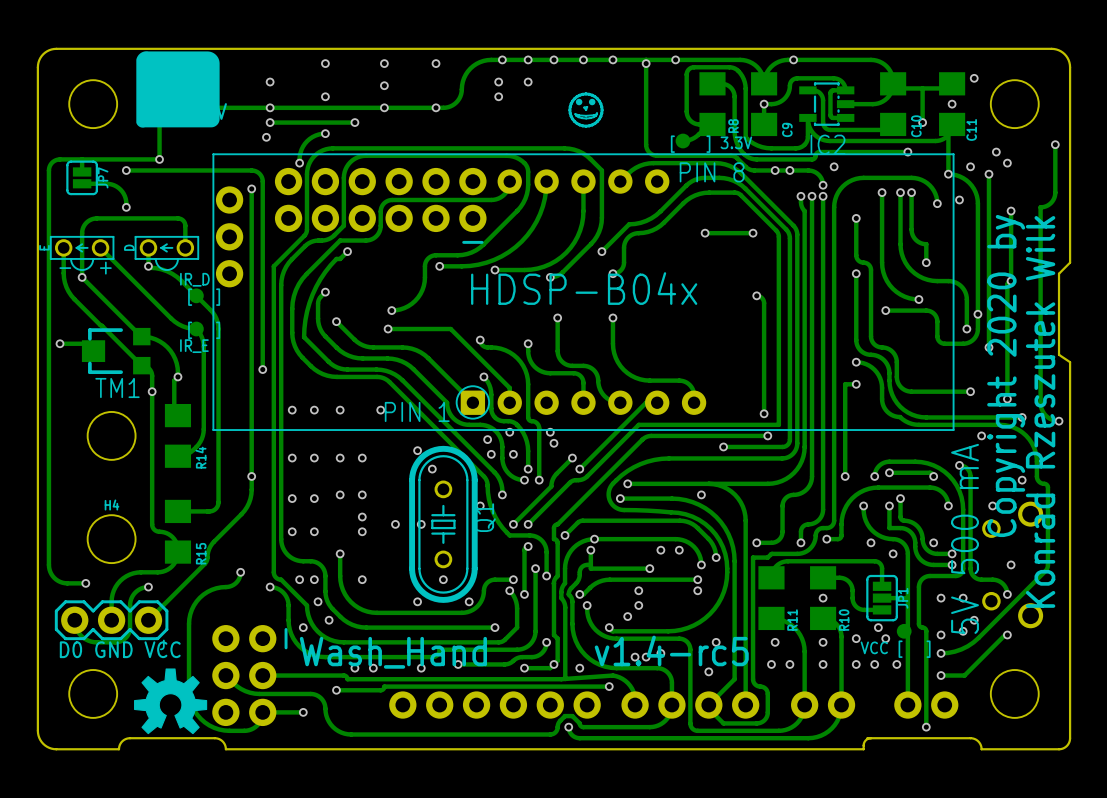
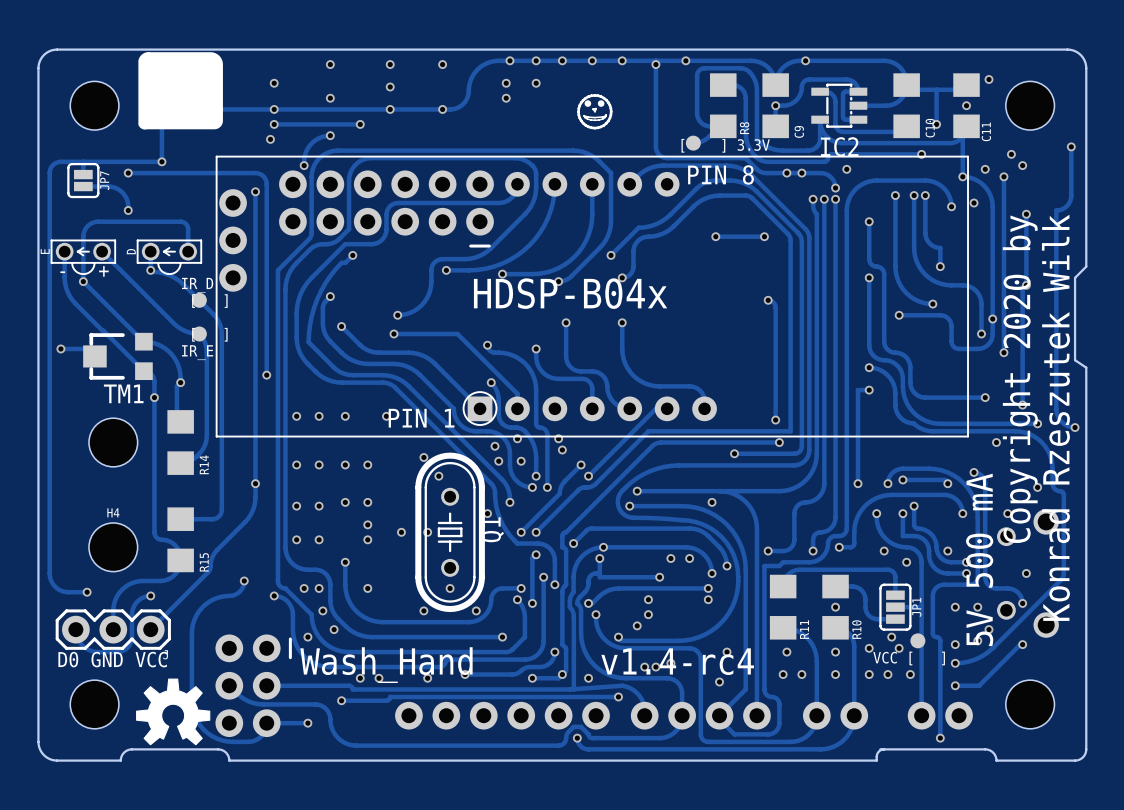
text: v1.4-rc5 (671, 650) -> v1.4-rc4 (677, 661)

